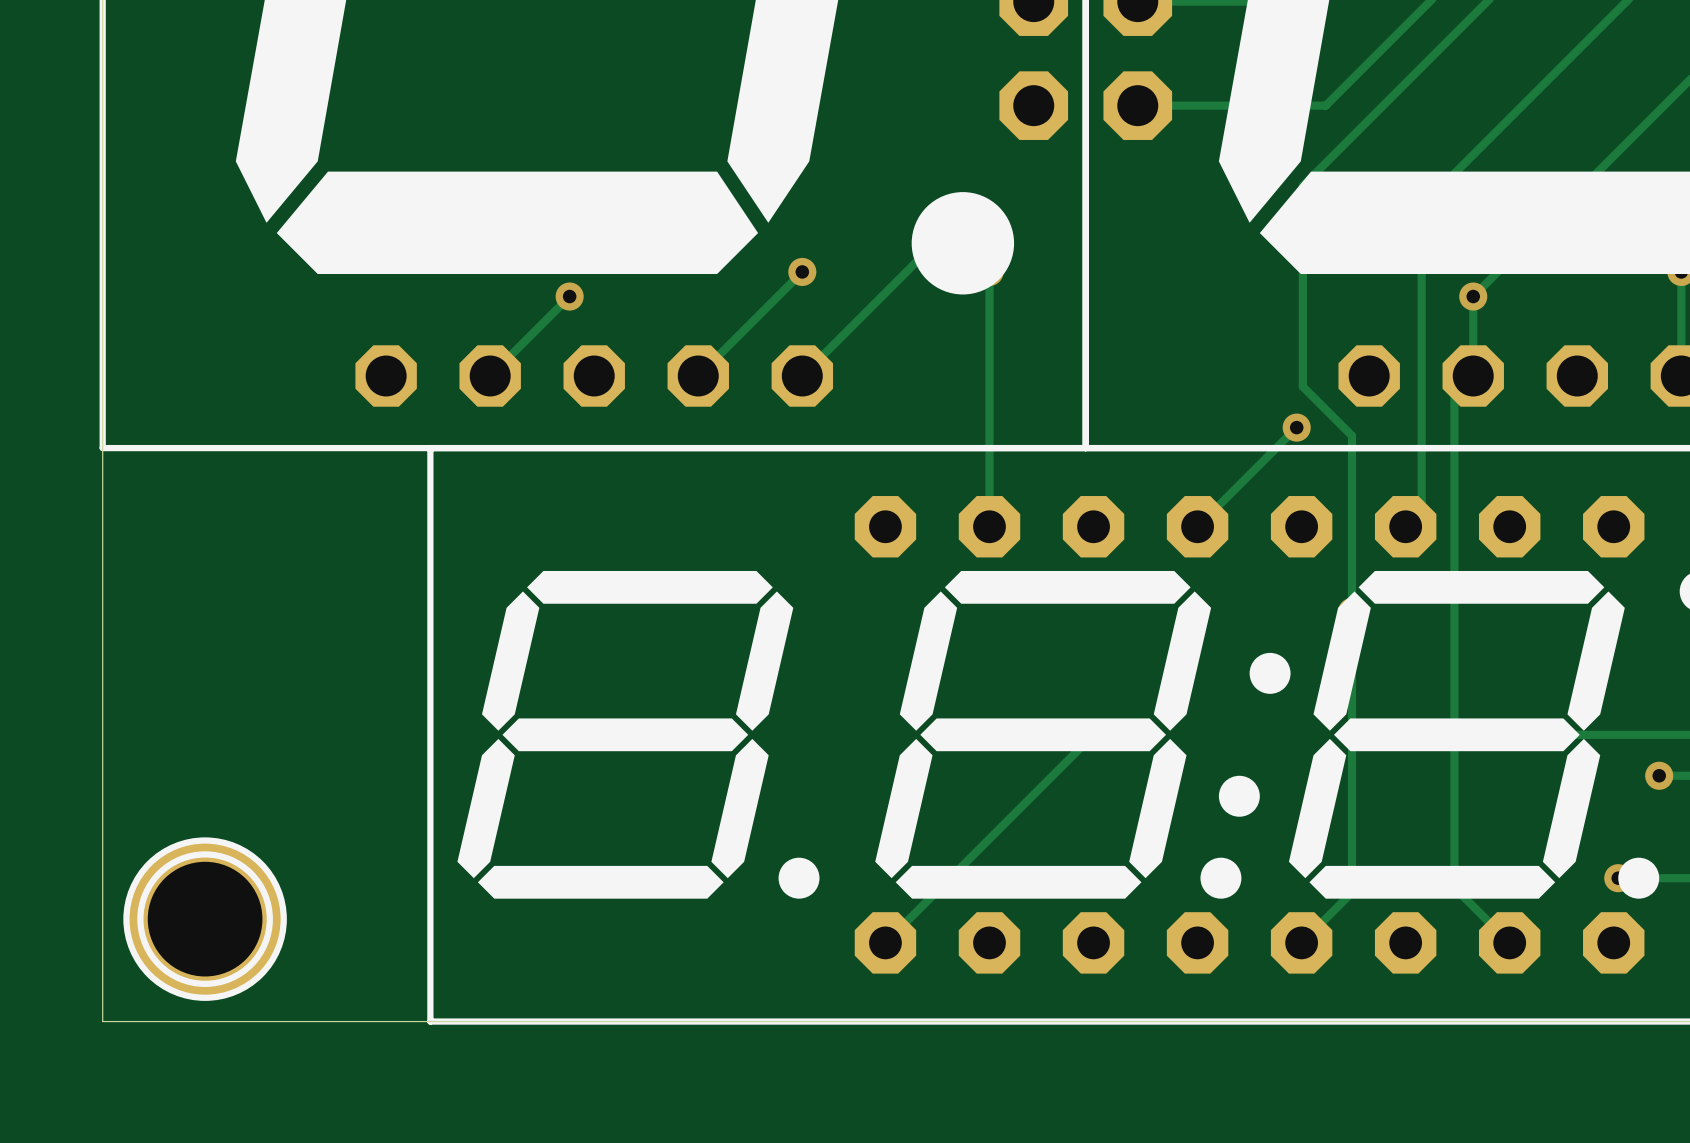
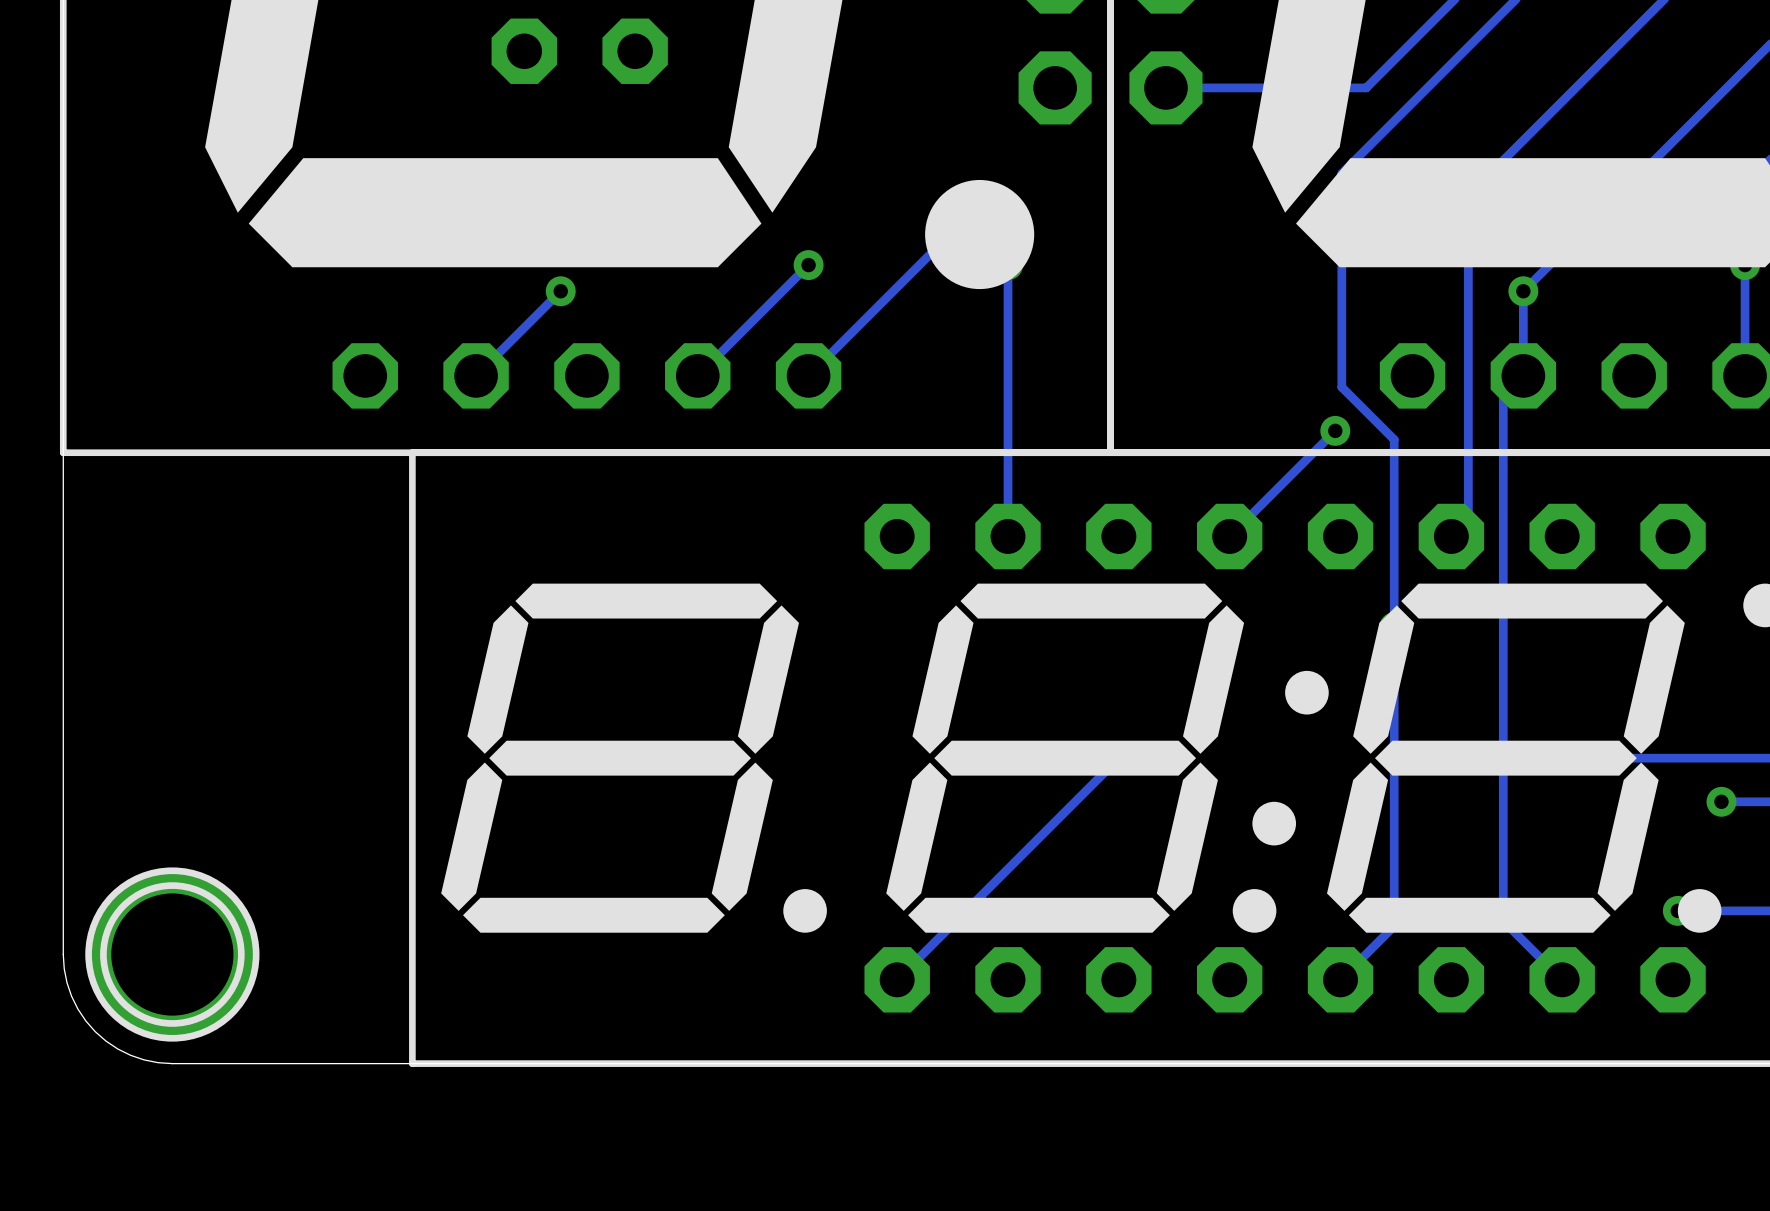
part: none -> (579, 51)
board edge: (102, 919) (102, 1021) (205, 1021) -> (63, 954) (64, 968) (71, 996) (77, 1009) (95, 1031) (117, 1049) (130, 1055) (158, 1062) (172, 1063)

